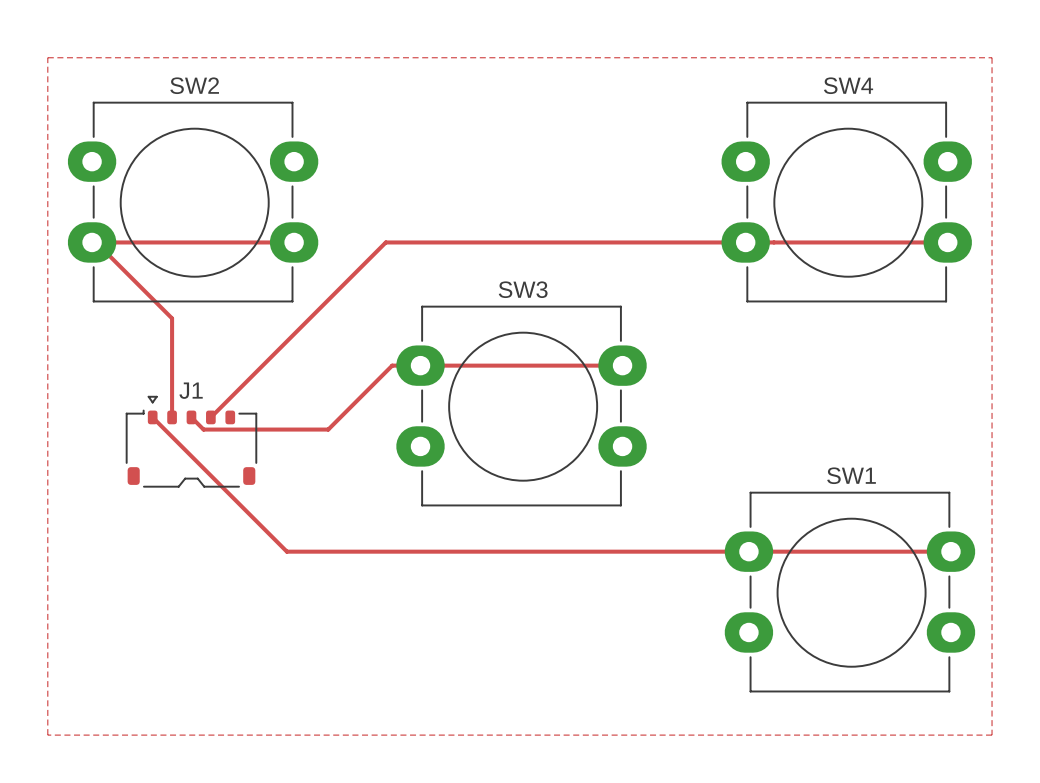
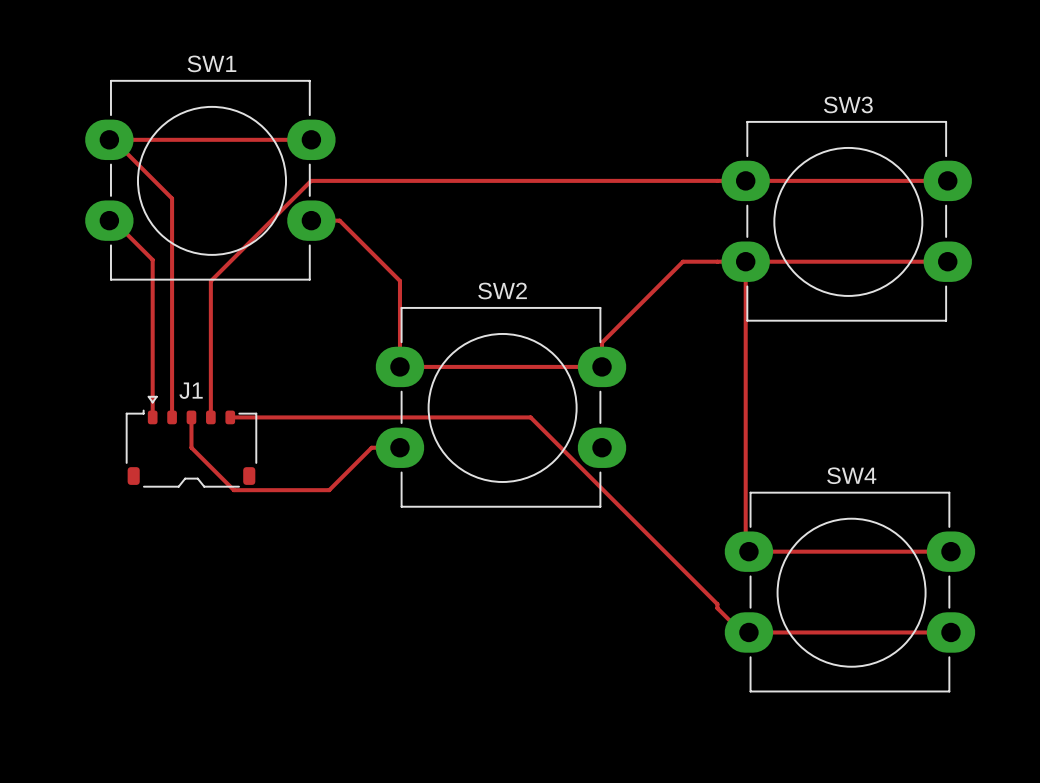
top zone outline: (47, 57) (47, 735) (992, 735) (992, 57) (47, 57) -> none
SW1: none -> (210, 180)
SW2 position: (193, 202) -> (500, 407)
SW4: (846, 202) -> none
top track: none -> (109, 220) (113, 220) (152, 259) (152, 417)
top track: none -> (311, 220) (339, 220) (399, 280) (399, 366) (602, 366) (602, 342) (682, 261) (947, 261)
top track: (92, 242) (294, 242) -> (109, 139) (311, 139)
top track: (96, 242) (172, 318) -> (113, 139) (172, 198) (172, 318)
top track: (947, 242) (385, 242) (210, 417) -> (947, 180) (311, 180) (210, 281) (210, 417)
top track: (622, 365) (392, 365) (328, 429) (203, 429) (191, 417) -> (399, 447) (371, 447) (329, 490) (233, 490) (191, 447) (191, 417)
SW3 position: (521, 406) -> (846, 221)
top track: (152, 417) (286, 551) (745, 551) -> (745, 261) (745, 551)
top track: none -> (230, 417) (530, 417) (717, 604) (717, 608) (741, 632)
SW1 name: SW1 (851, 475) -> SW4 (851, 475)
top track: none -> (745, 632) (947, 632)

